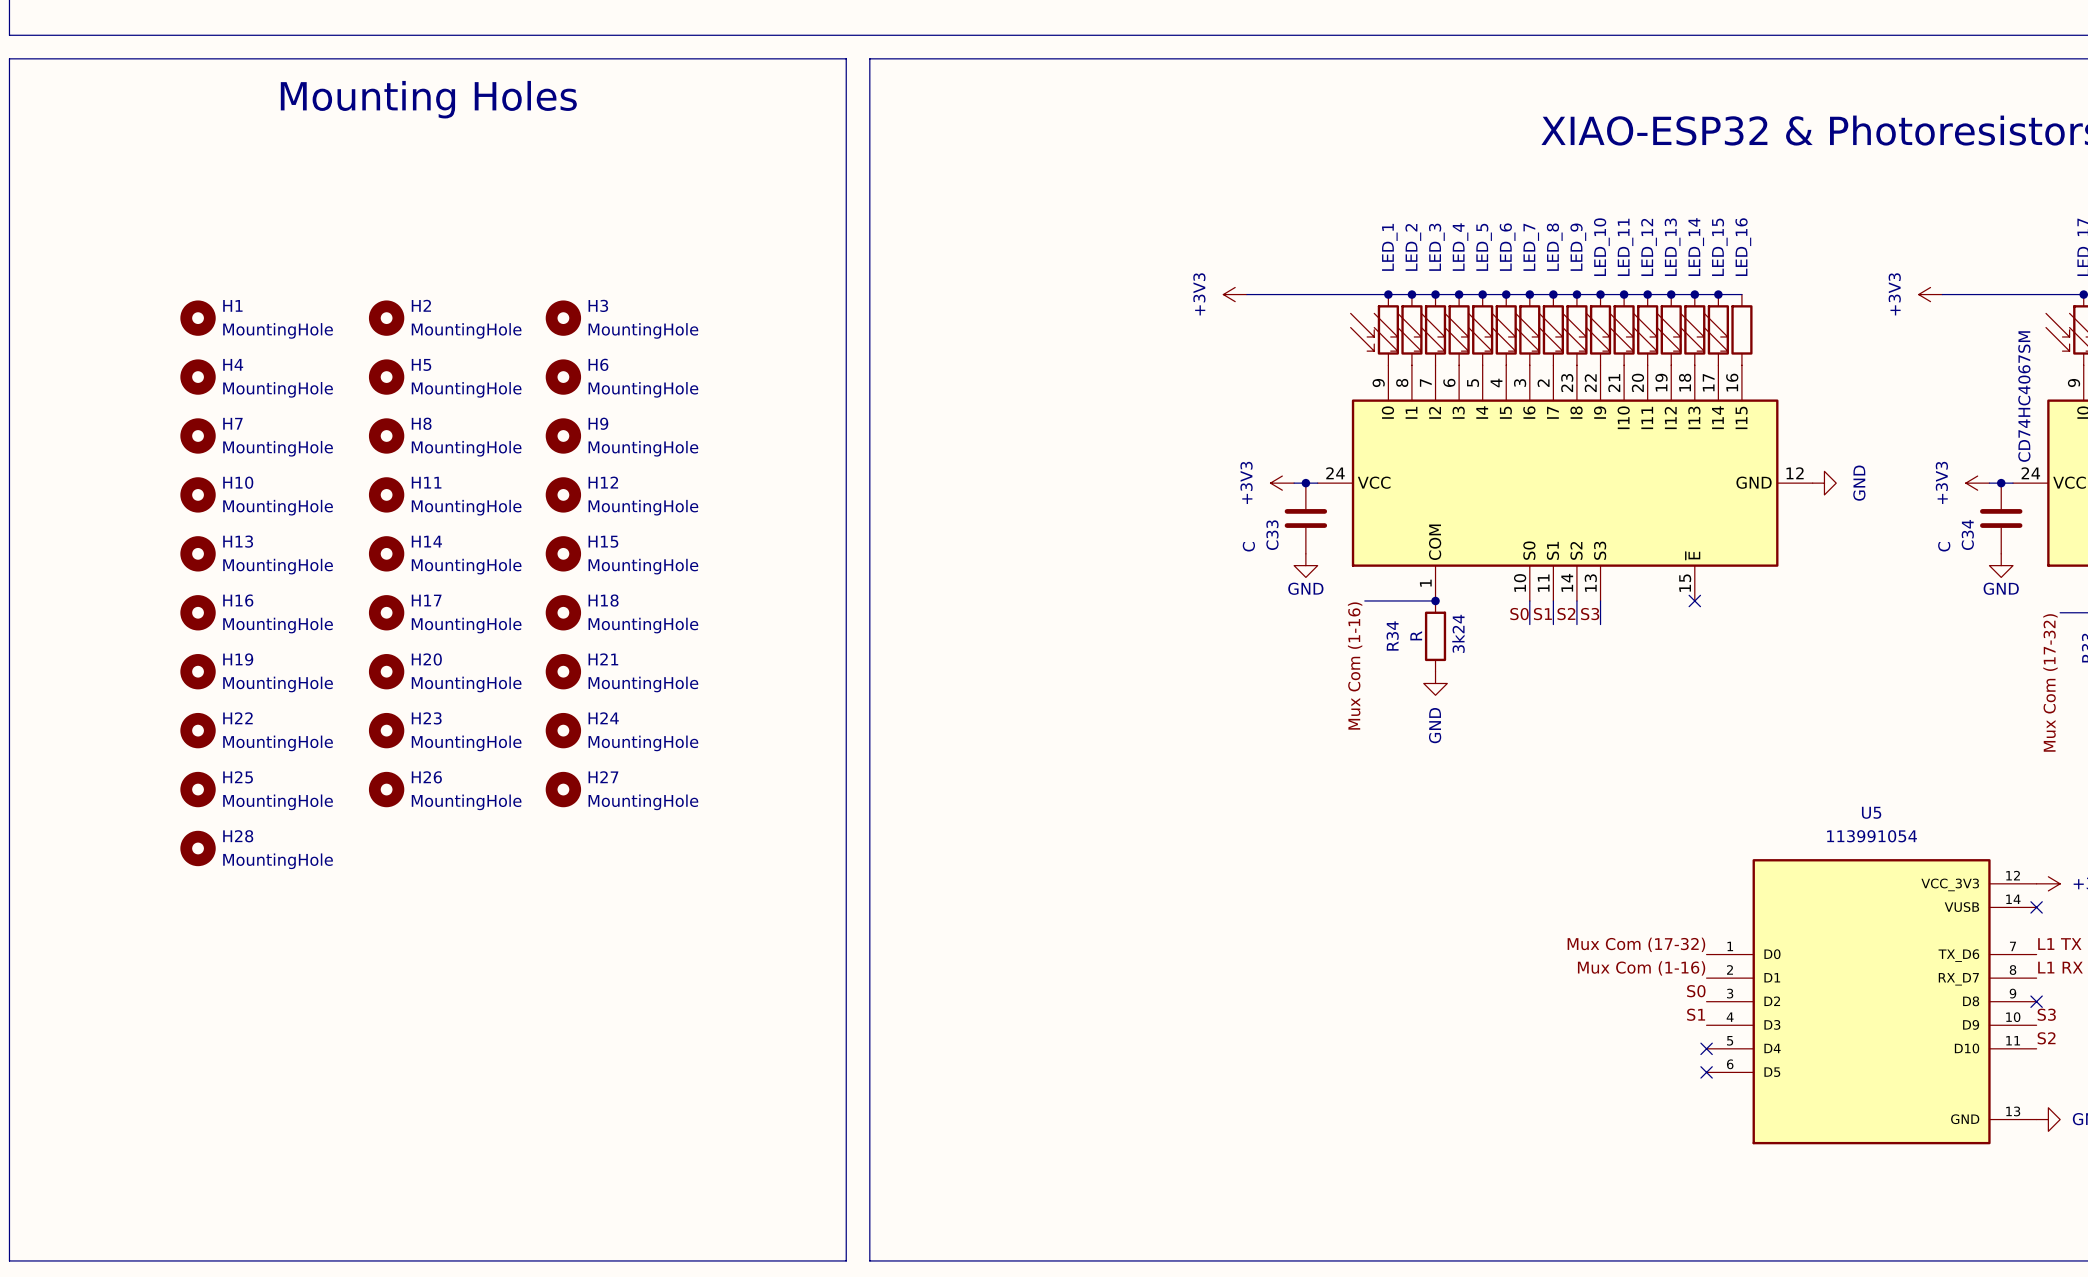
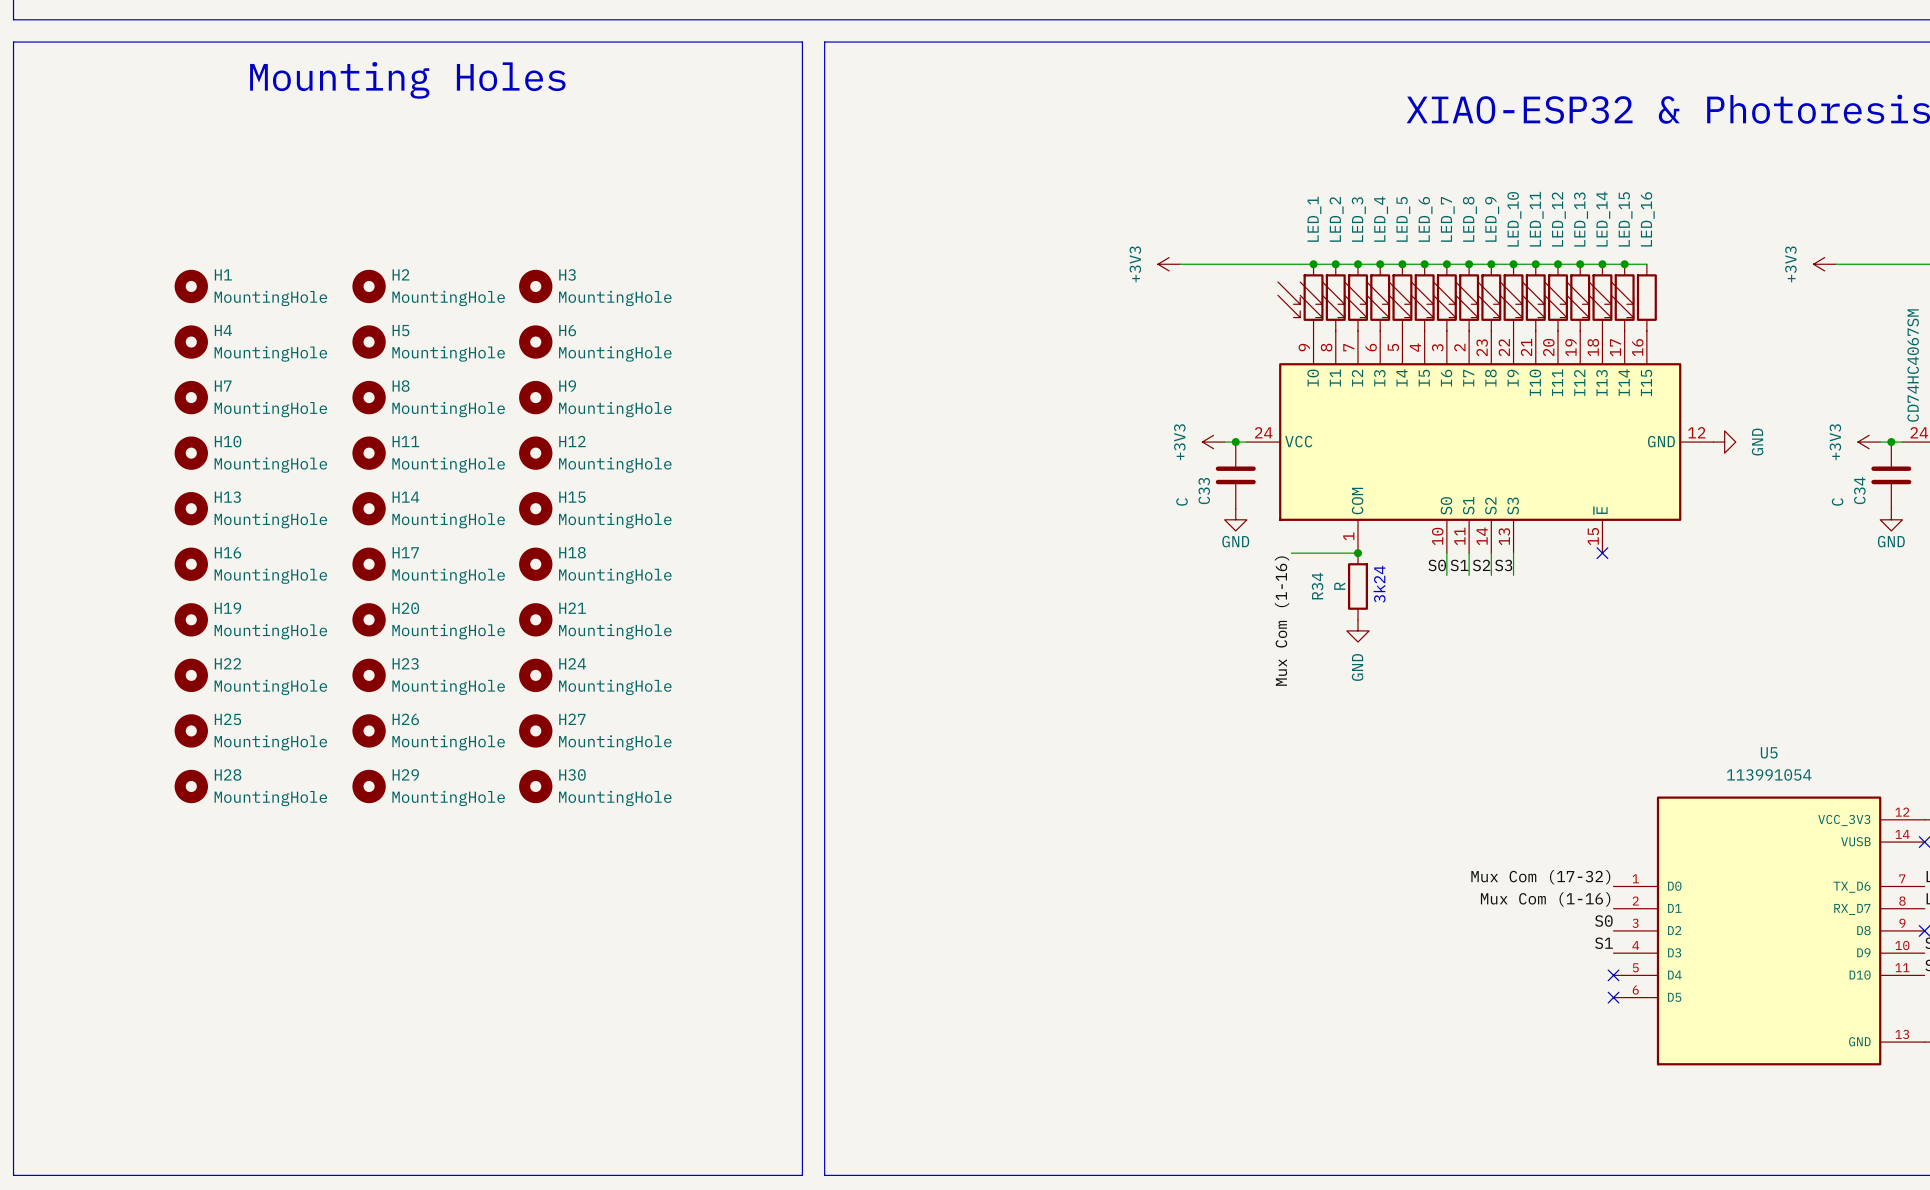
H29: none -> MountingHole (369, 786)
H30: none -> MountingHole (535, 786)

